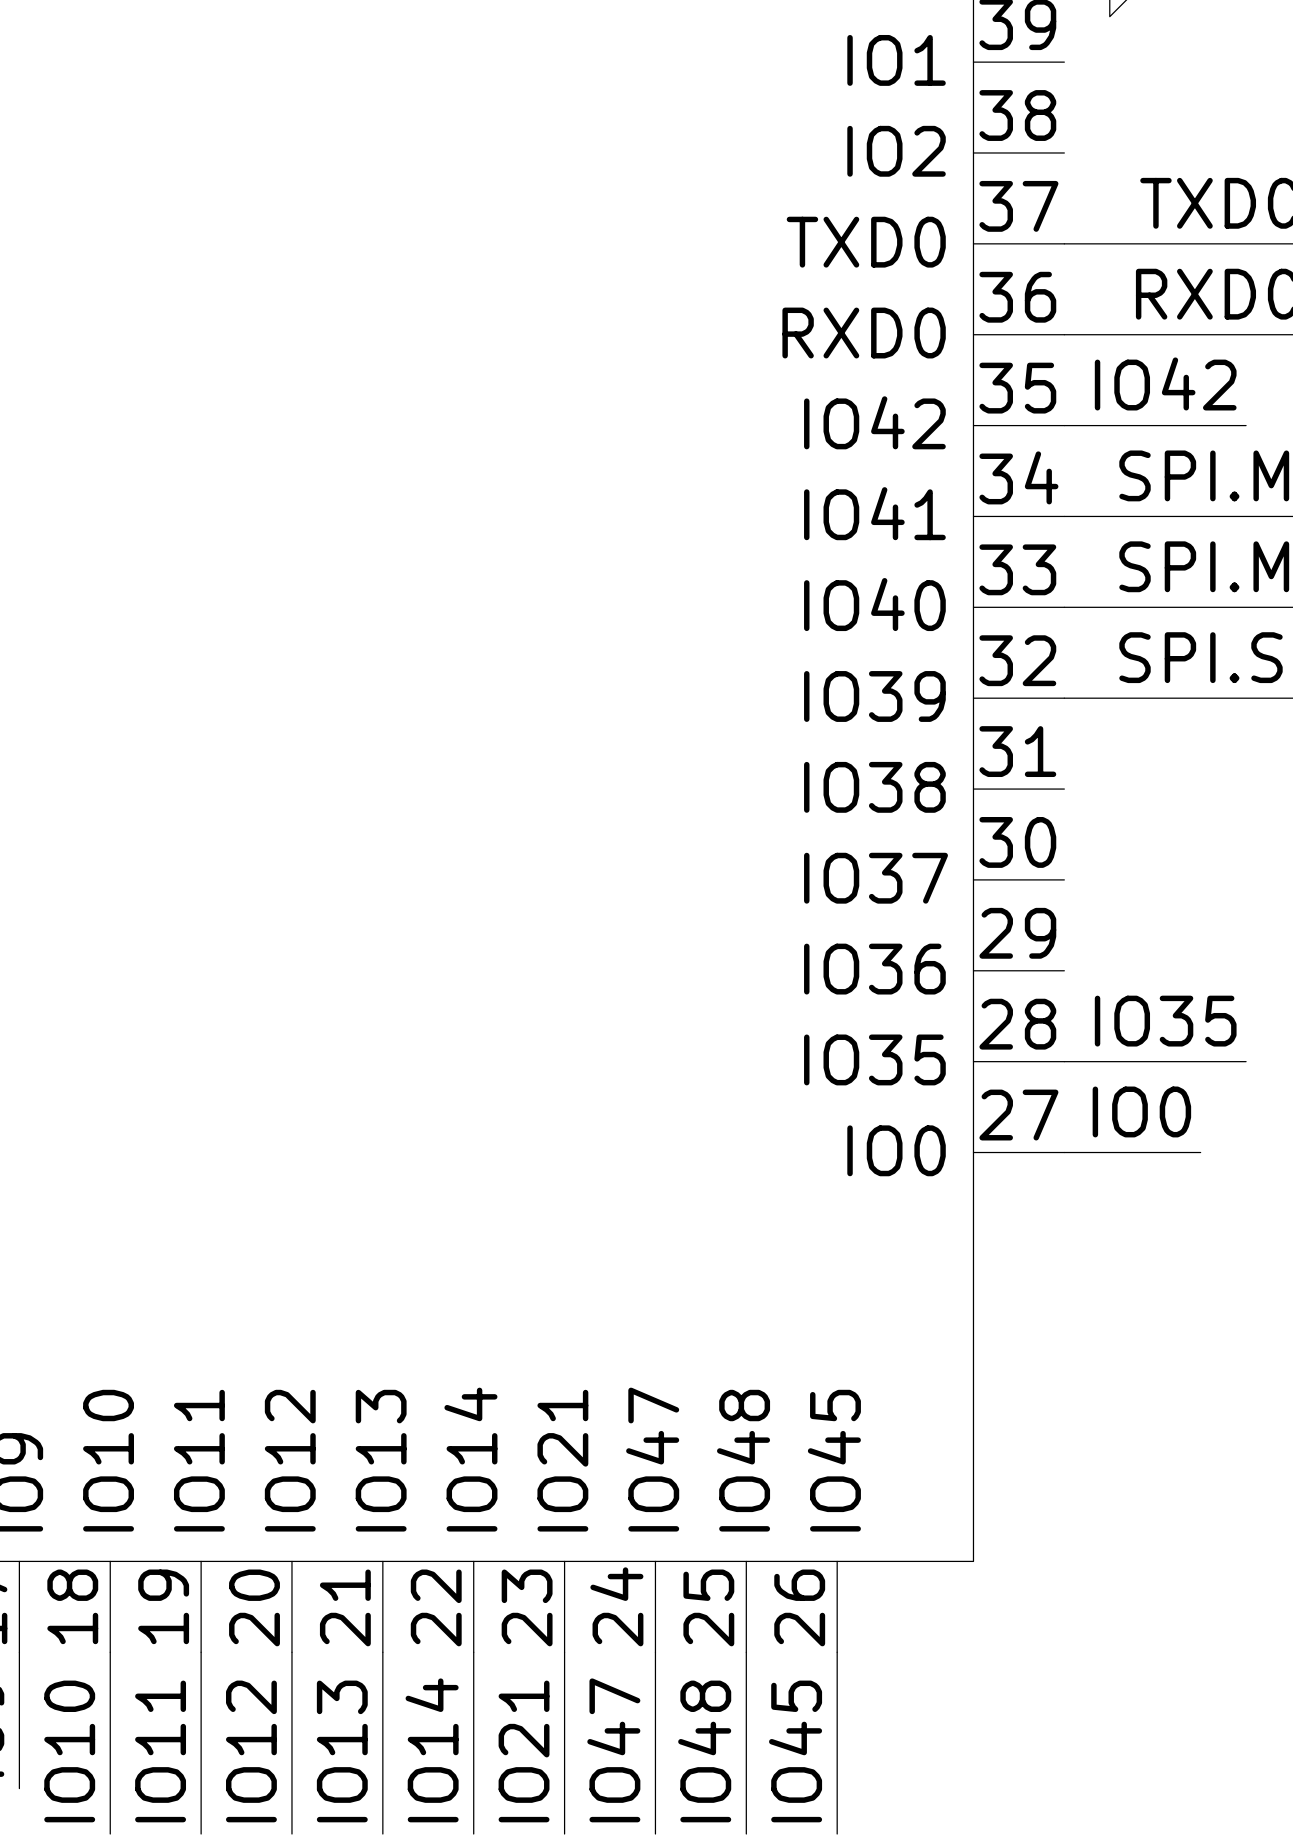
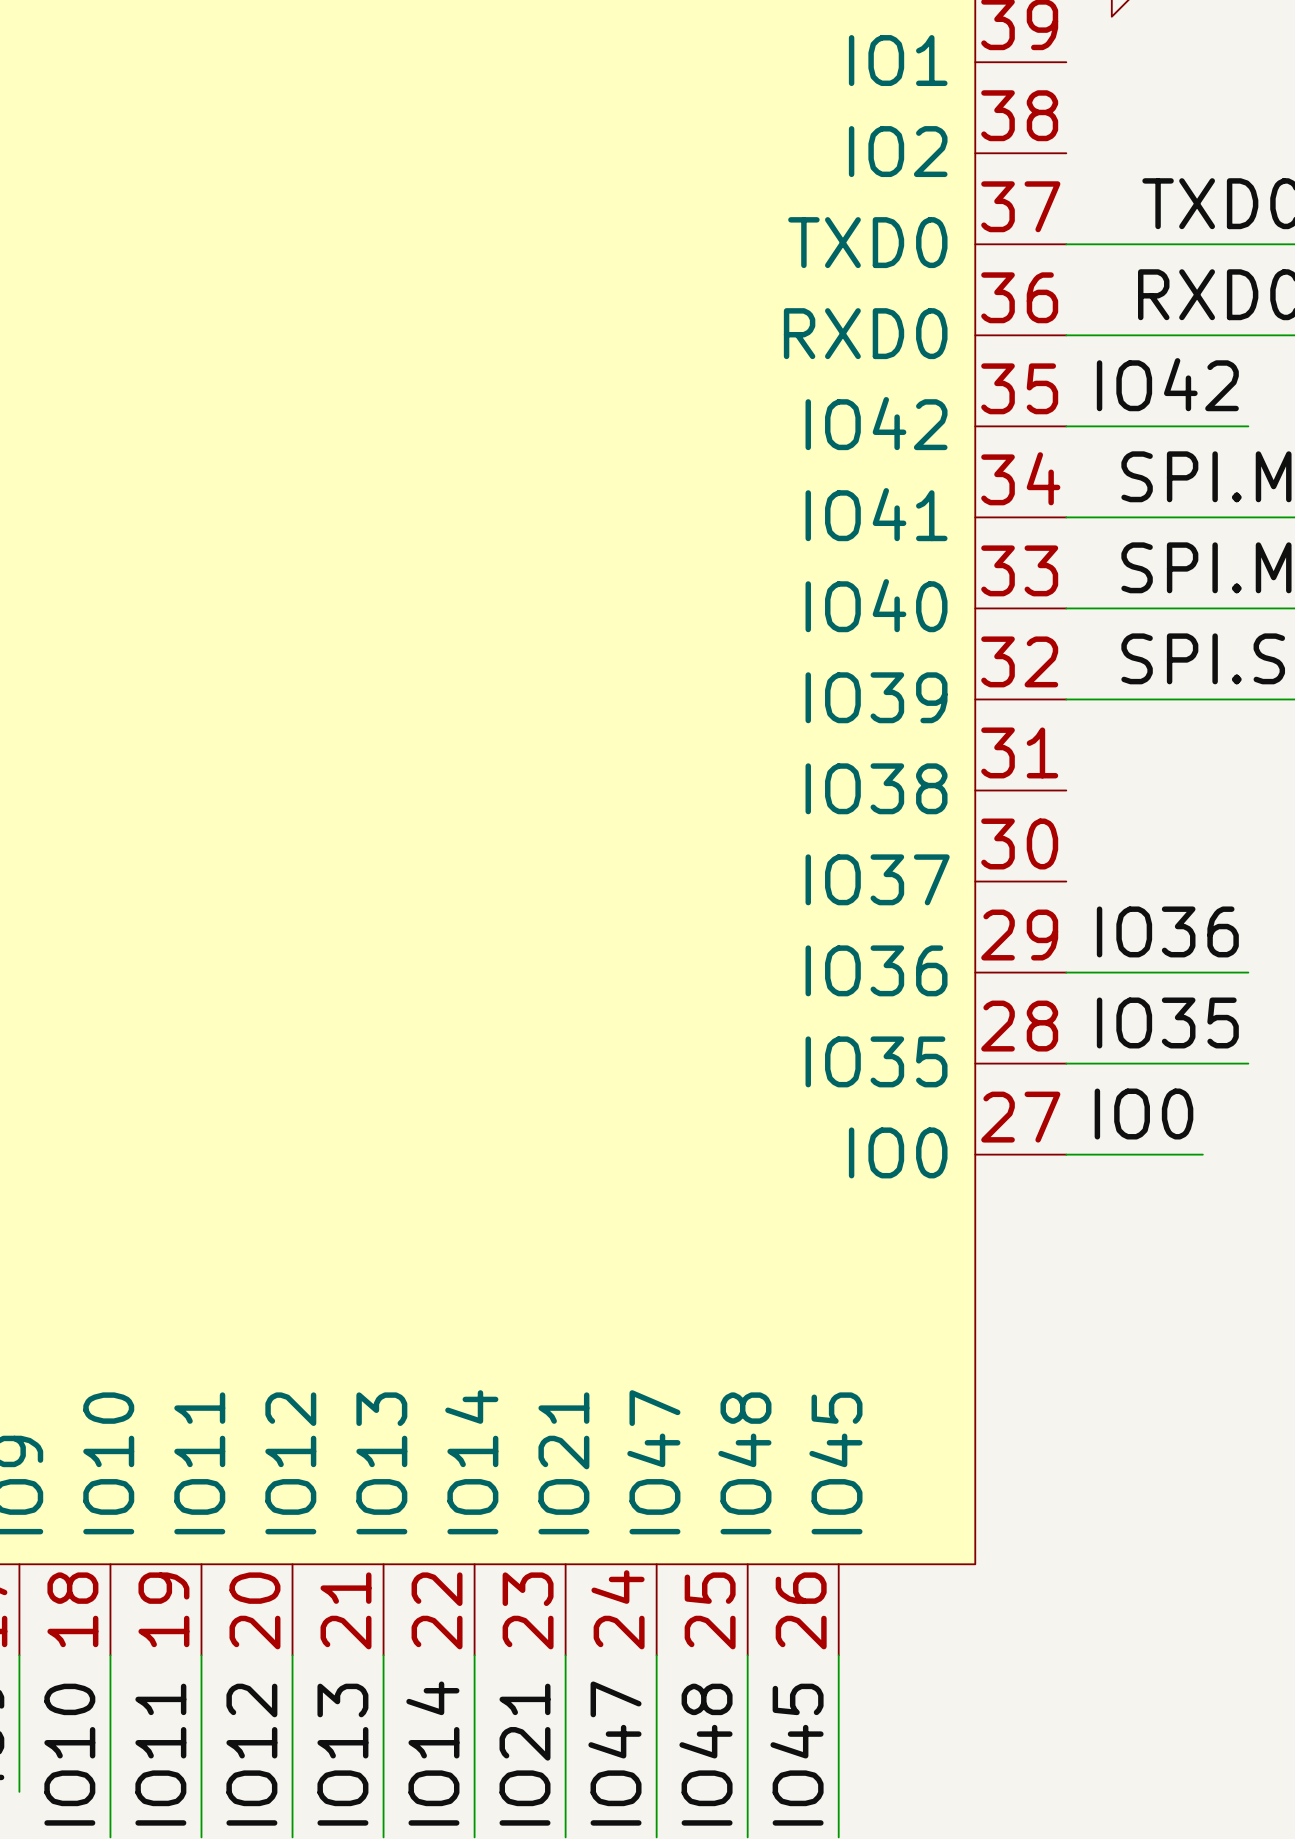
label: none -> IO36 (1167, 931)
wire: none -> (1066, 972) (1248, 972)

